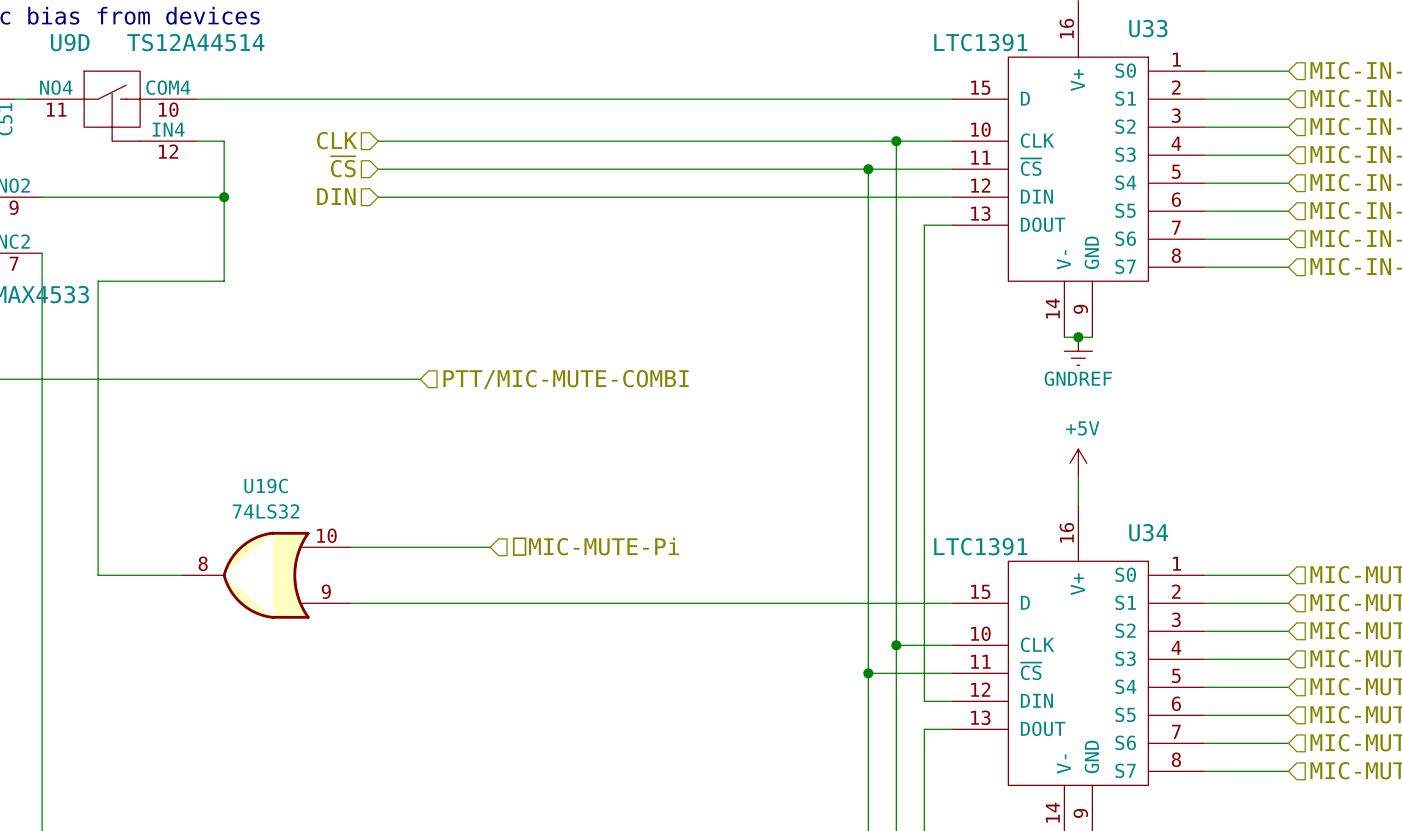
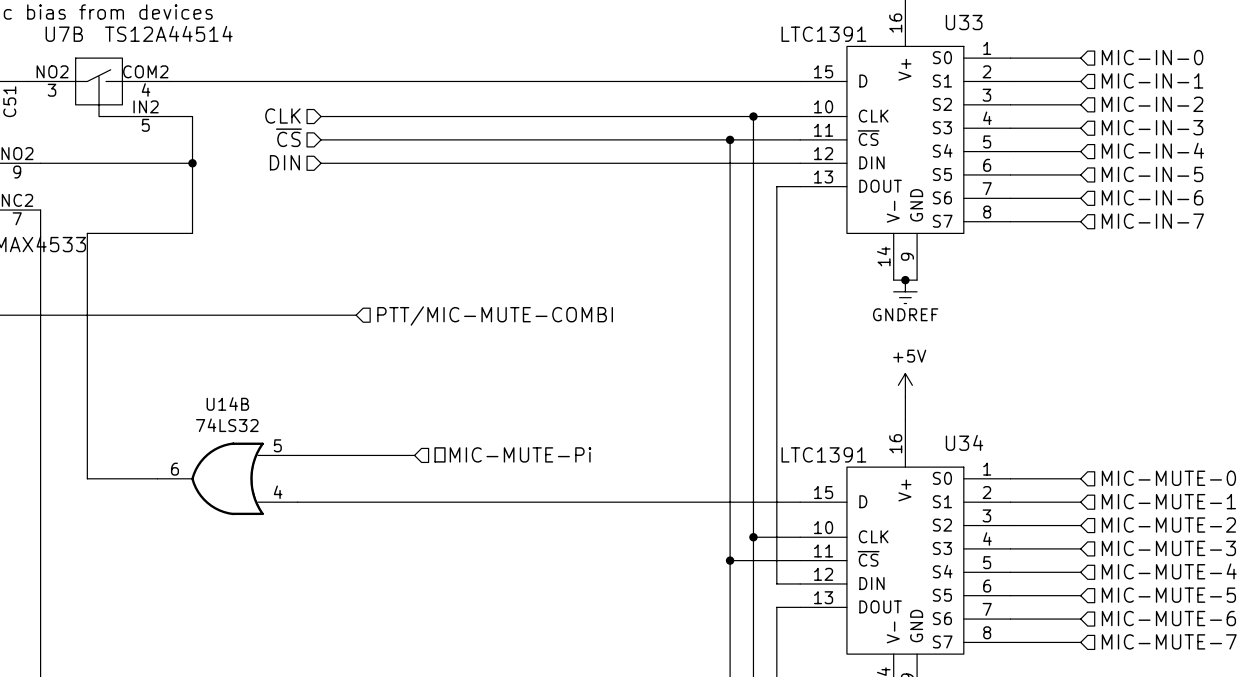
U9D name: U9D (70, 42) -> U7B (64, 34)
U9D pin name: NO4 (56, 87) -> NO2 (52, 71)
U9D pin name: COM4 (168, 87) -> COM2 (145, 71)
U9D pin number: 11 (56, 109) -> 3 (52, 90)
U9D pin number: 10 (168, 109) -> 4 (146, 89)
U9D pin name: IN4 (168, 129) -> IN2 (146, 106)
U9D pin number: 12 (168, 151) -> 5 (145, 125)
U19C name: U19C (266, 486) -> U14B (227, 404)
U19C pin number: 10 (326, 535) -> 5 (277, 445)
U19C pin number: 8 (203, 563) -> 6 (174, 469)
U19C pin number: 9 (326, 591) -> 4 (278, 492)

